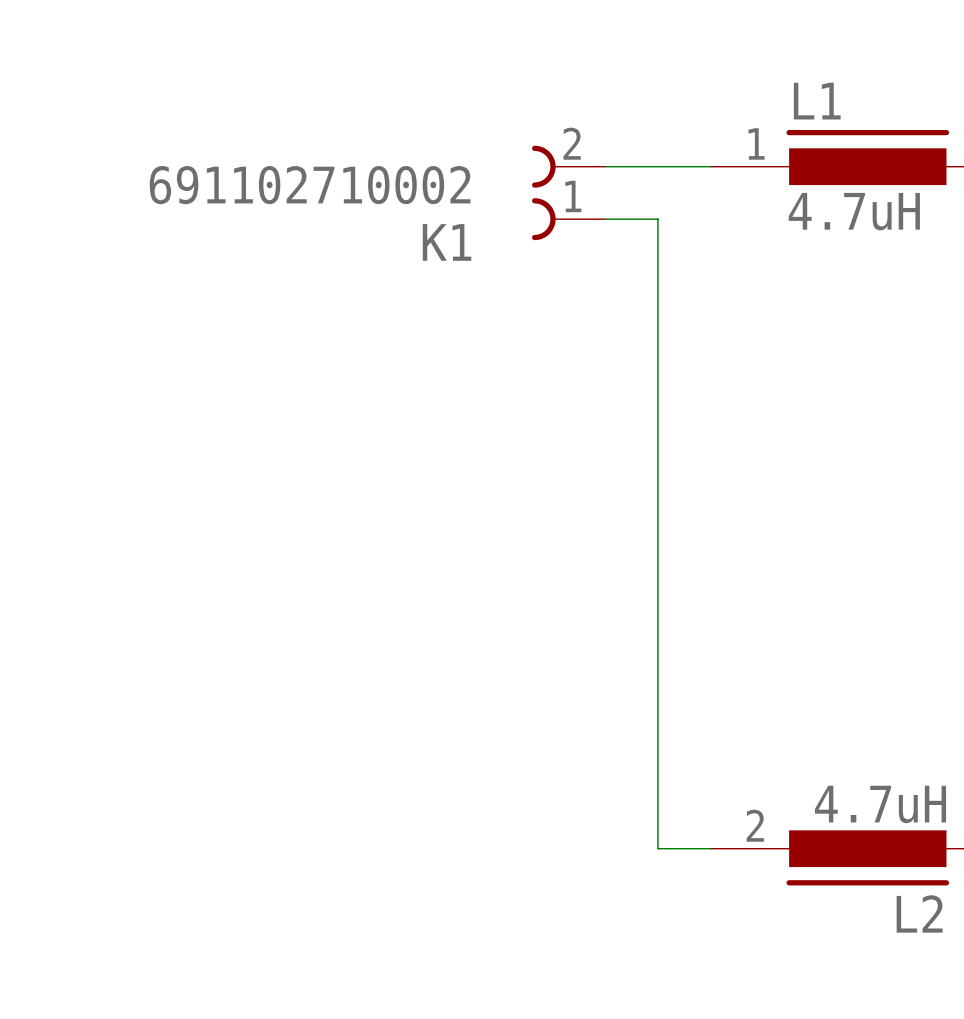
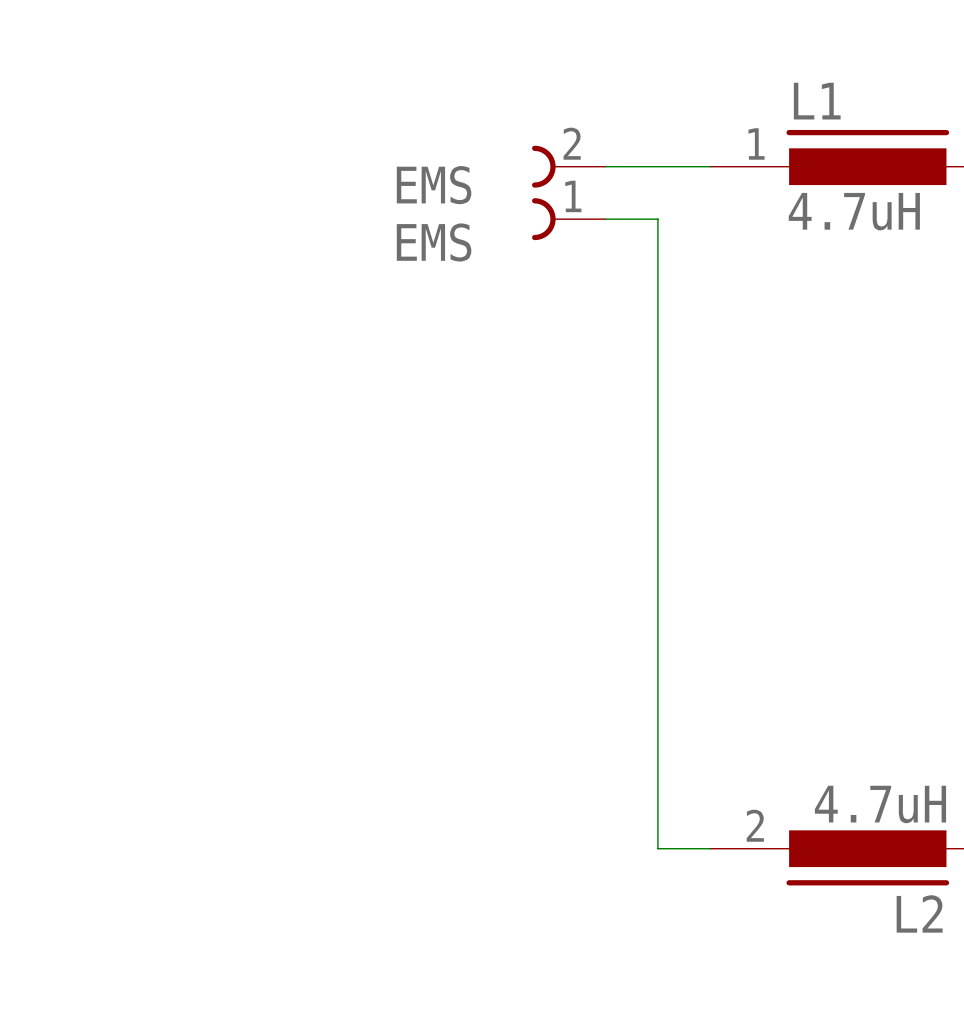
K1 value: 691102710002 (310, 185) -> EMS (434, 185)
K1 name: K1 (447, 242) -> EMS (434, 242)

